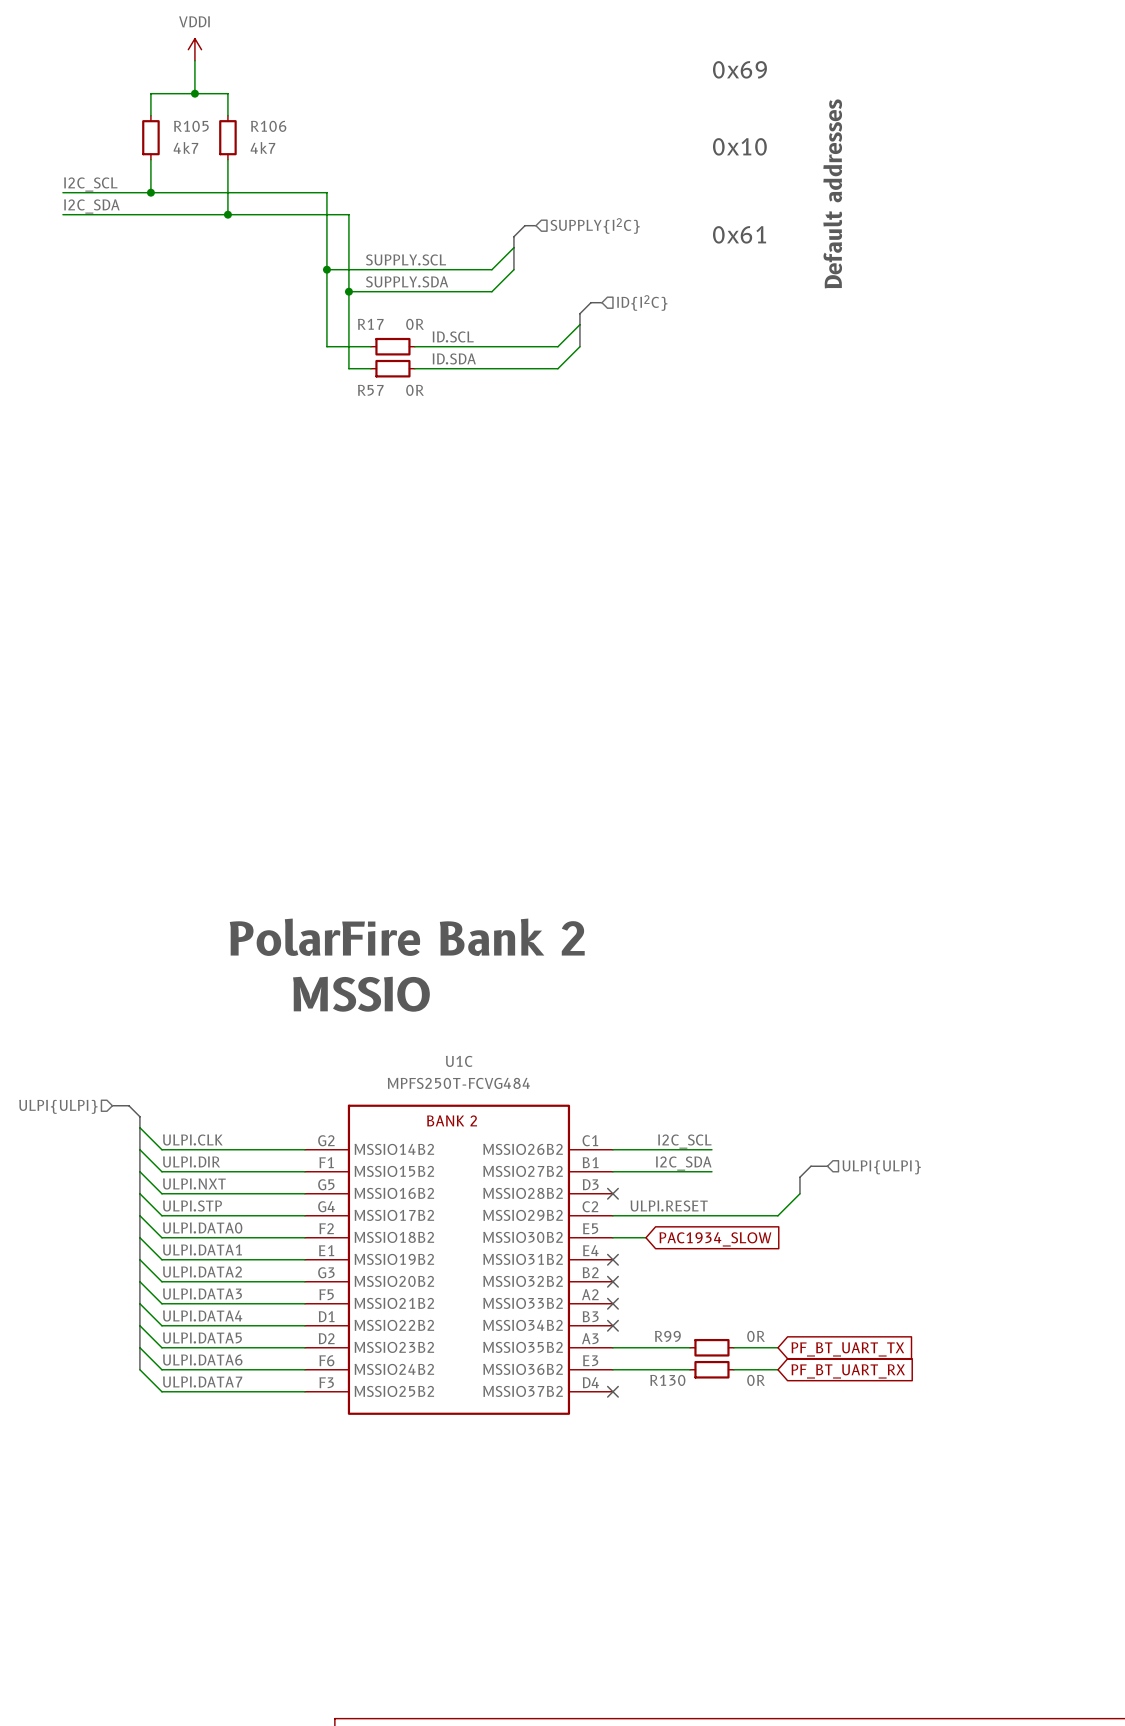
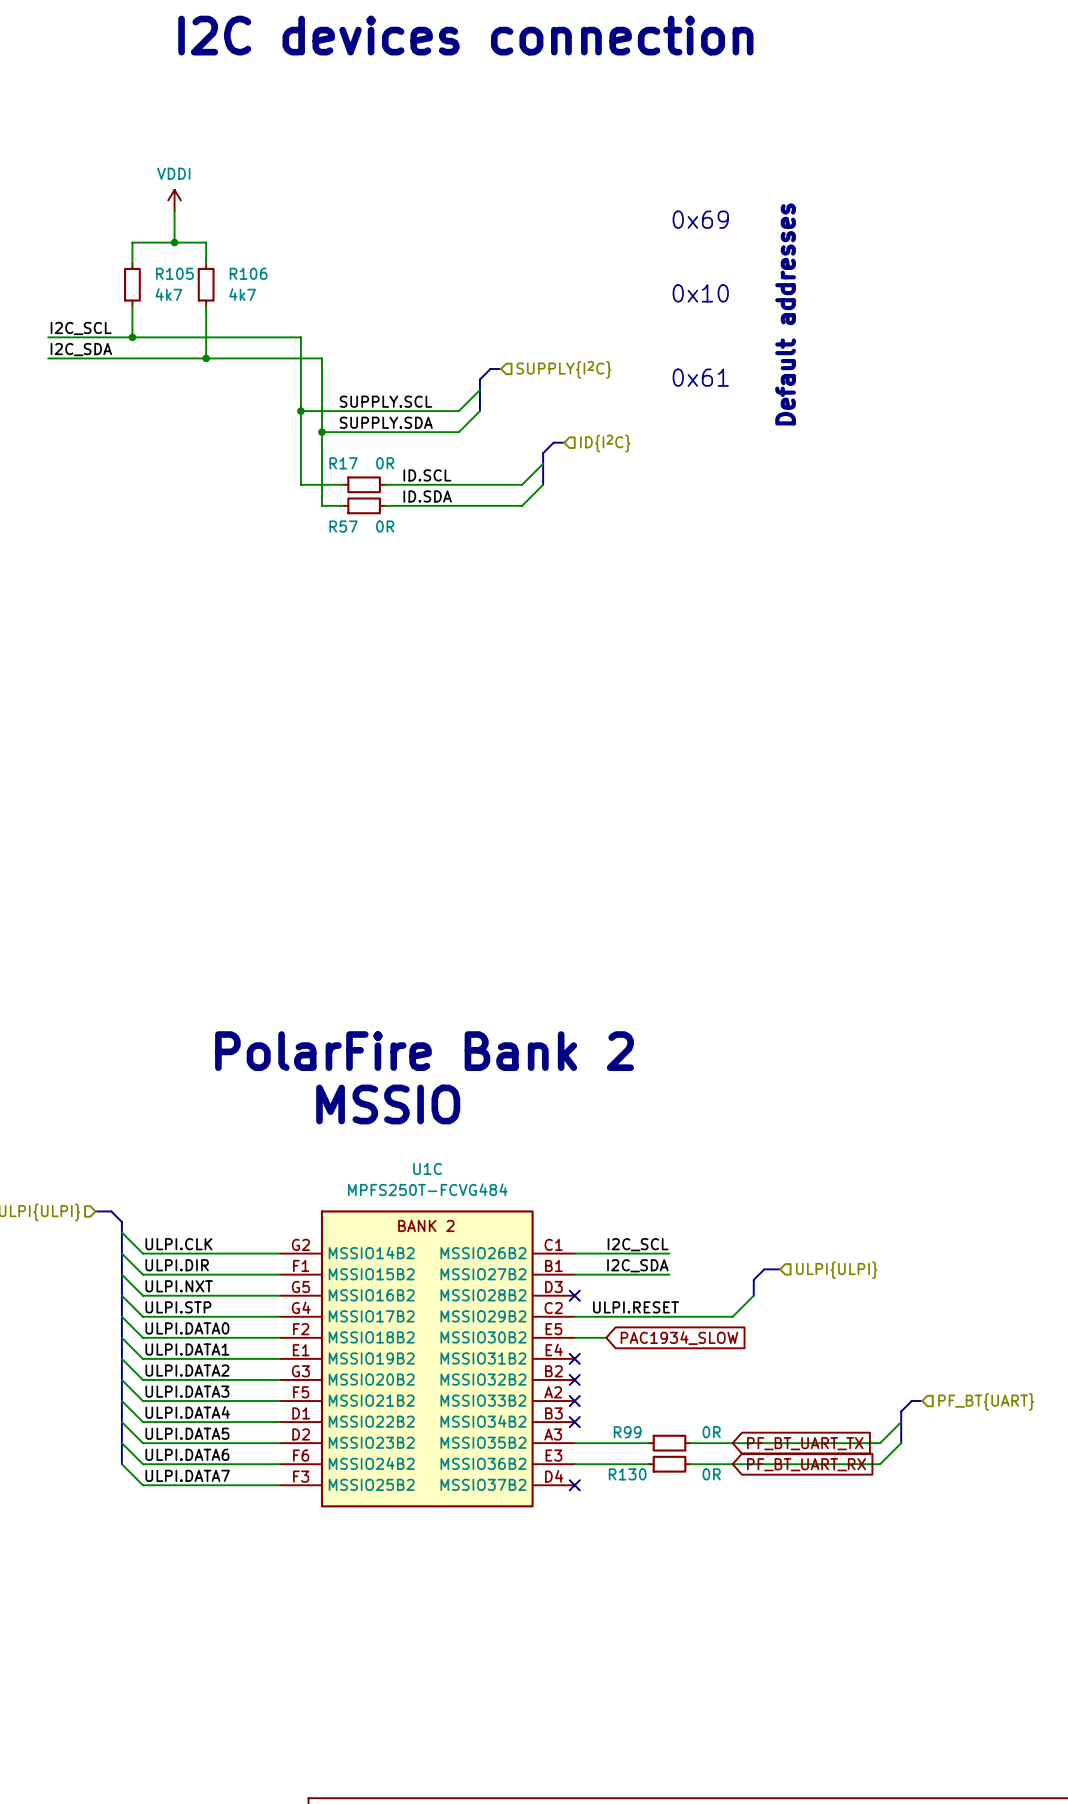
bus: none -> (922, 1401) (911, 1401) (901, 1411) (901, 1443)
hierarchical label: none -> PF_BT{UART} (986, 1401)
wire: none -> (901, 1422) (880, 1443) (732, 1443)
wire: none -> (901, 1443) (880, 1464) (732, 1464)

